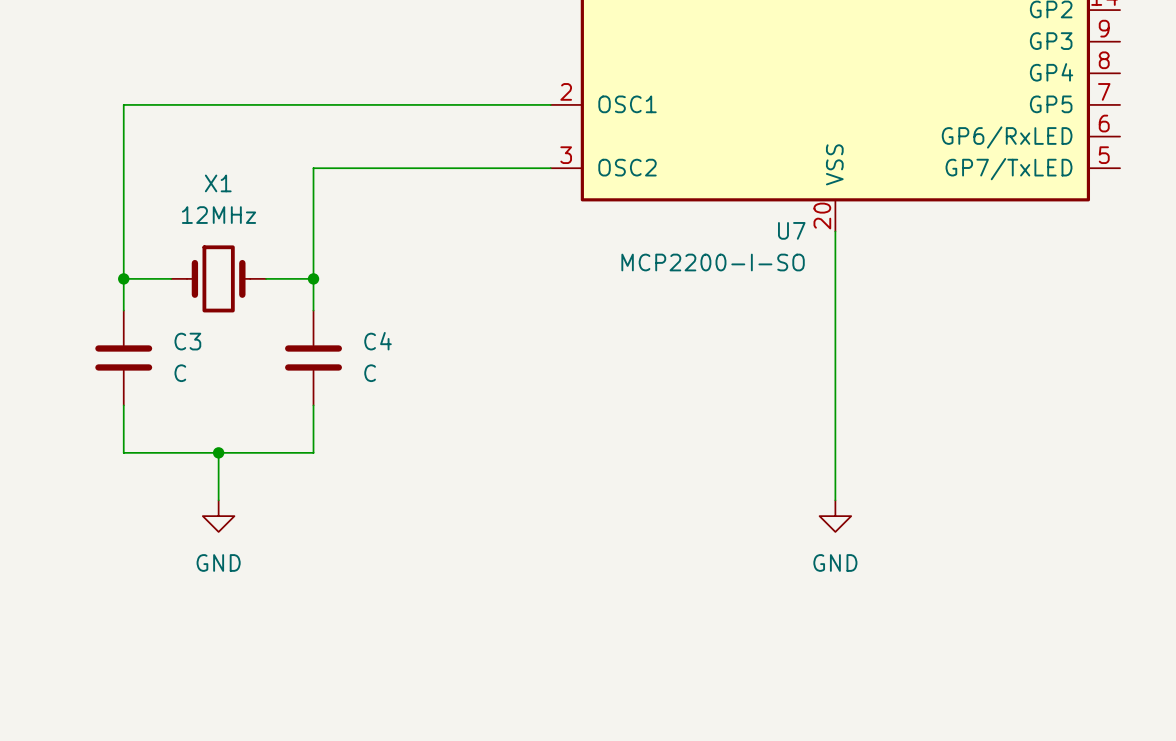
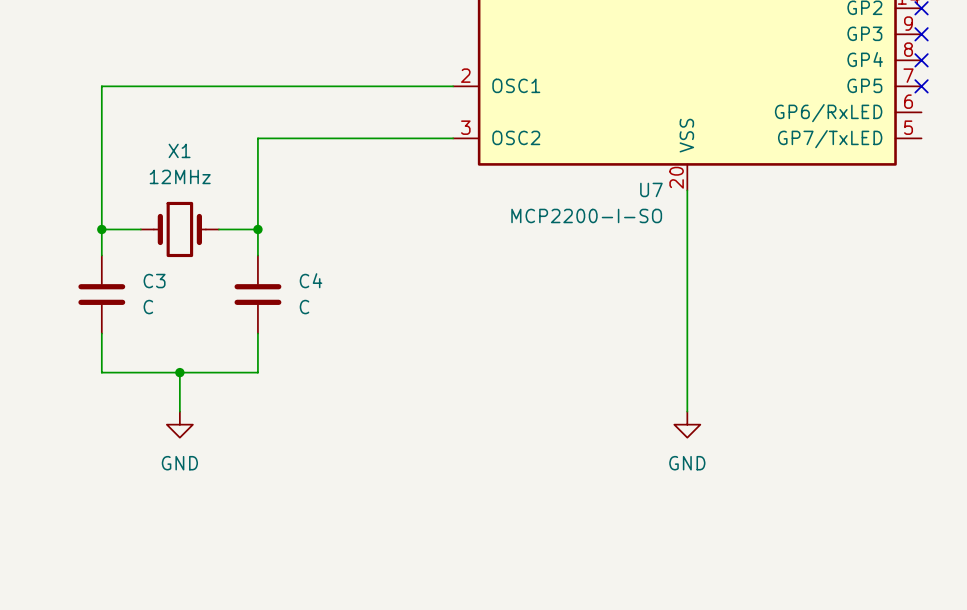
no-connect mark: none -> (921, 8)
no-connect mark: none -> (921, 34)
no-connect mark: none -> (921, 60)
no-connect mark: none -> (921, 86)

